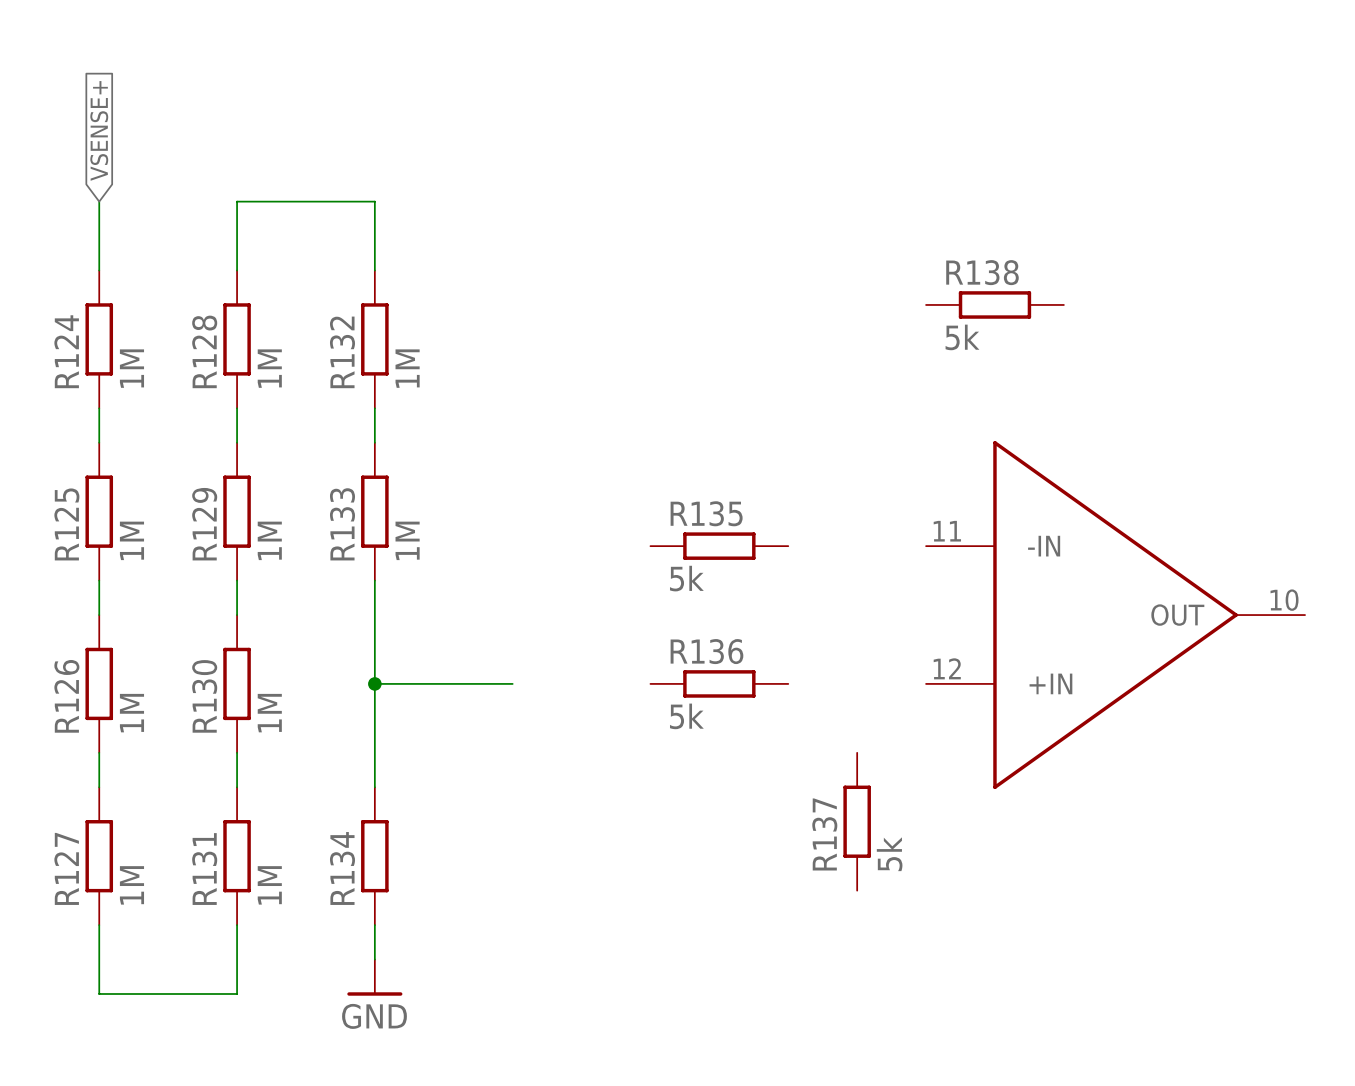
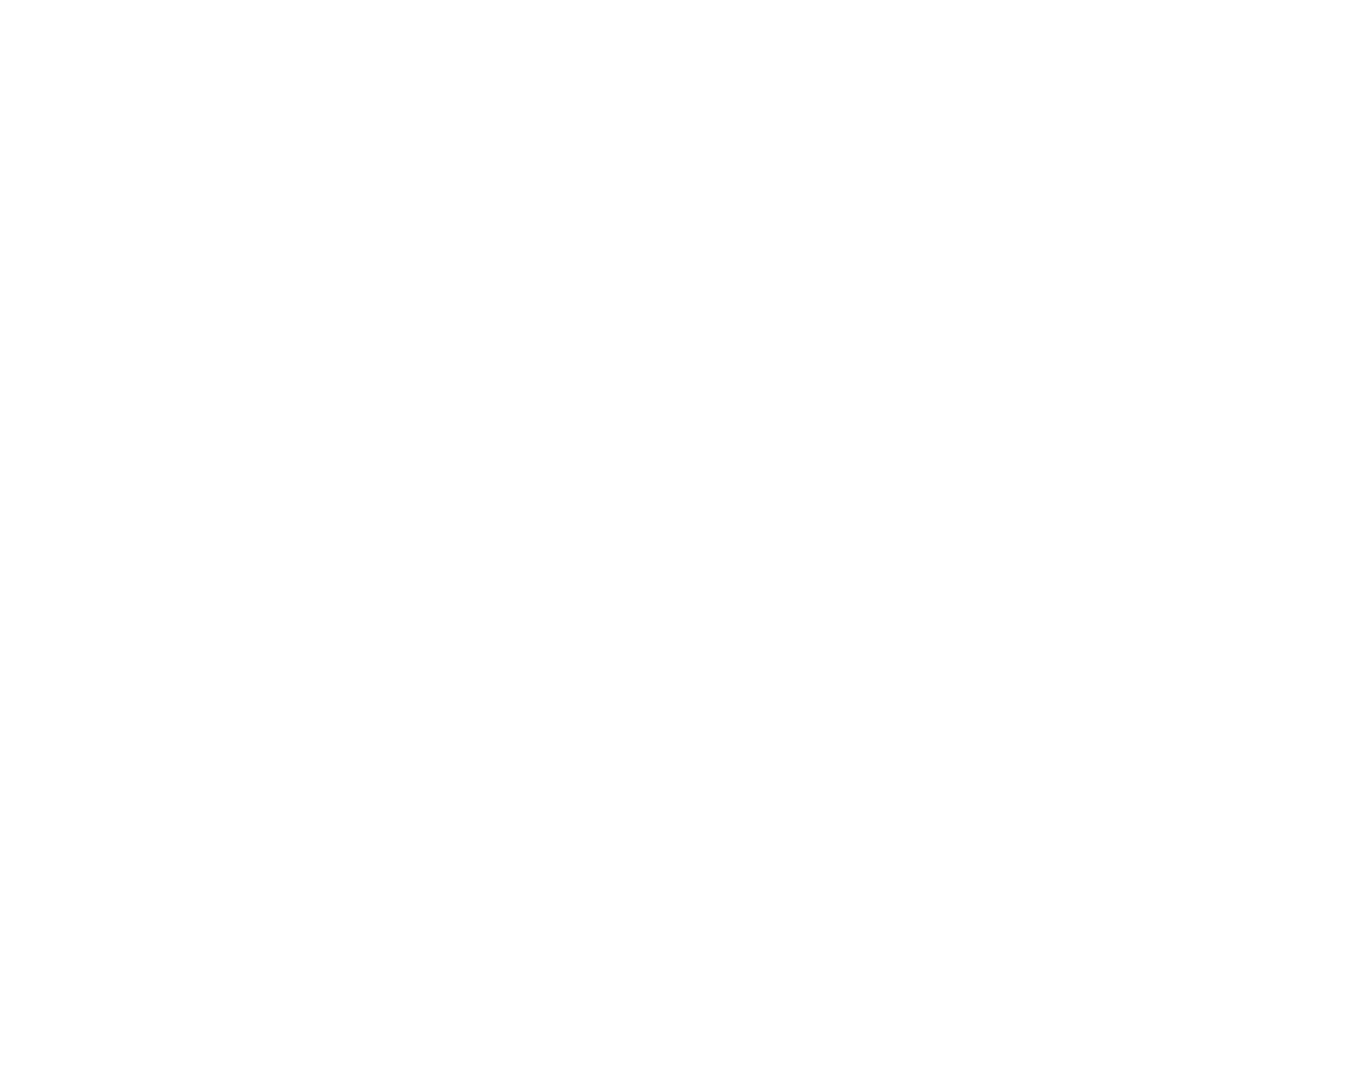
global label: VSENSE+ (99, 130) -> none
wire: (99, 201) (99, 270) -> none
wire: (237, 270) (237, 201) (374, 201) (374, 270) -> none
R138: 5k (994, 304) -> none
R124: 1M (99, 339) -> none
R128: 1M (237, 339) -> none
R132: 1M (374, 339) -> none
wire: (99, 408) (99, 442) -> none
wire: (237, 408) (237, 442) -> none
wire: (374, 408) (374, 442) -> none
R125: 1M (99, 511) -> none
R129: 1M (237, 511) -> none
R133: 1M (374, 511) -> none
R135: 5k (719, 546) -> none
wire: (99, 580) (99, 615) -> none
wire: (237, 580) (237, 615) -> none
wire: (374, 580) (374, 787) -> none
part: (1115, 615) -> none
R126: 1M (99, 683) -> none
R130: 1M (237, 683) -> none
wire: (374, 683) (512, 683) -> none
junction: (374, 683) -> none
R136: 5k (719, 683) -> none
wire: (99, 752) (99, 787) -> none
wire: (237, 752) (237, 787) -> none
R137: 5k (857, 821) -> none
R127: 1M (99, 856) -> none
R131: 1M (237, 856) -> none
R134: (374, 856) -> none
wire: (99, 925) (99, 993) (237, 993) (237, 925) -> none
wire: (374, 925) (374, 959) -> none
power symbol: GND (374, 977) -> none

